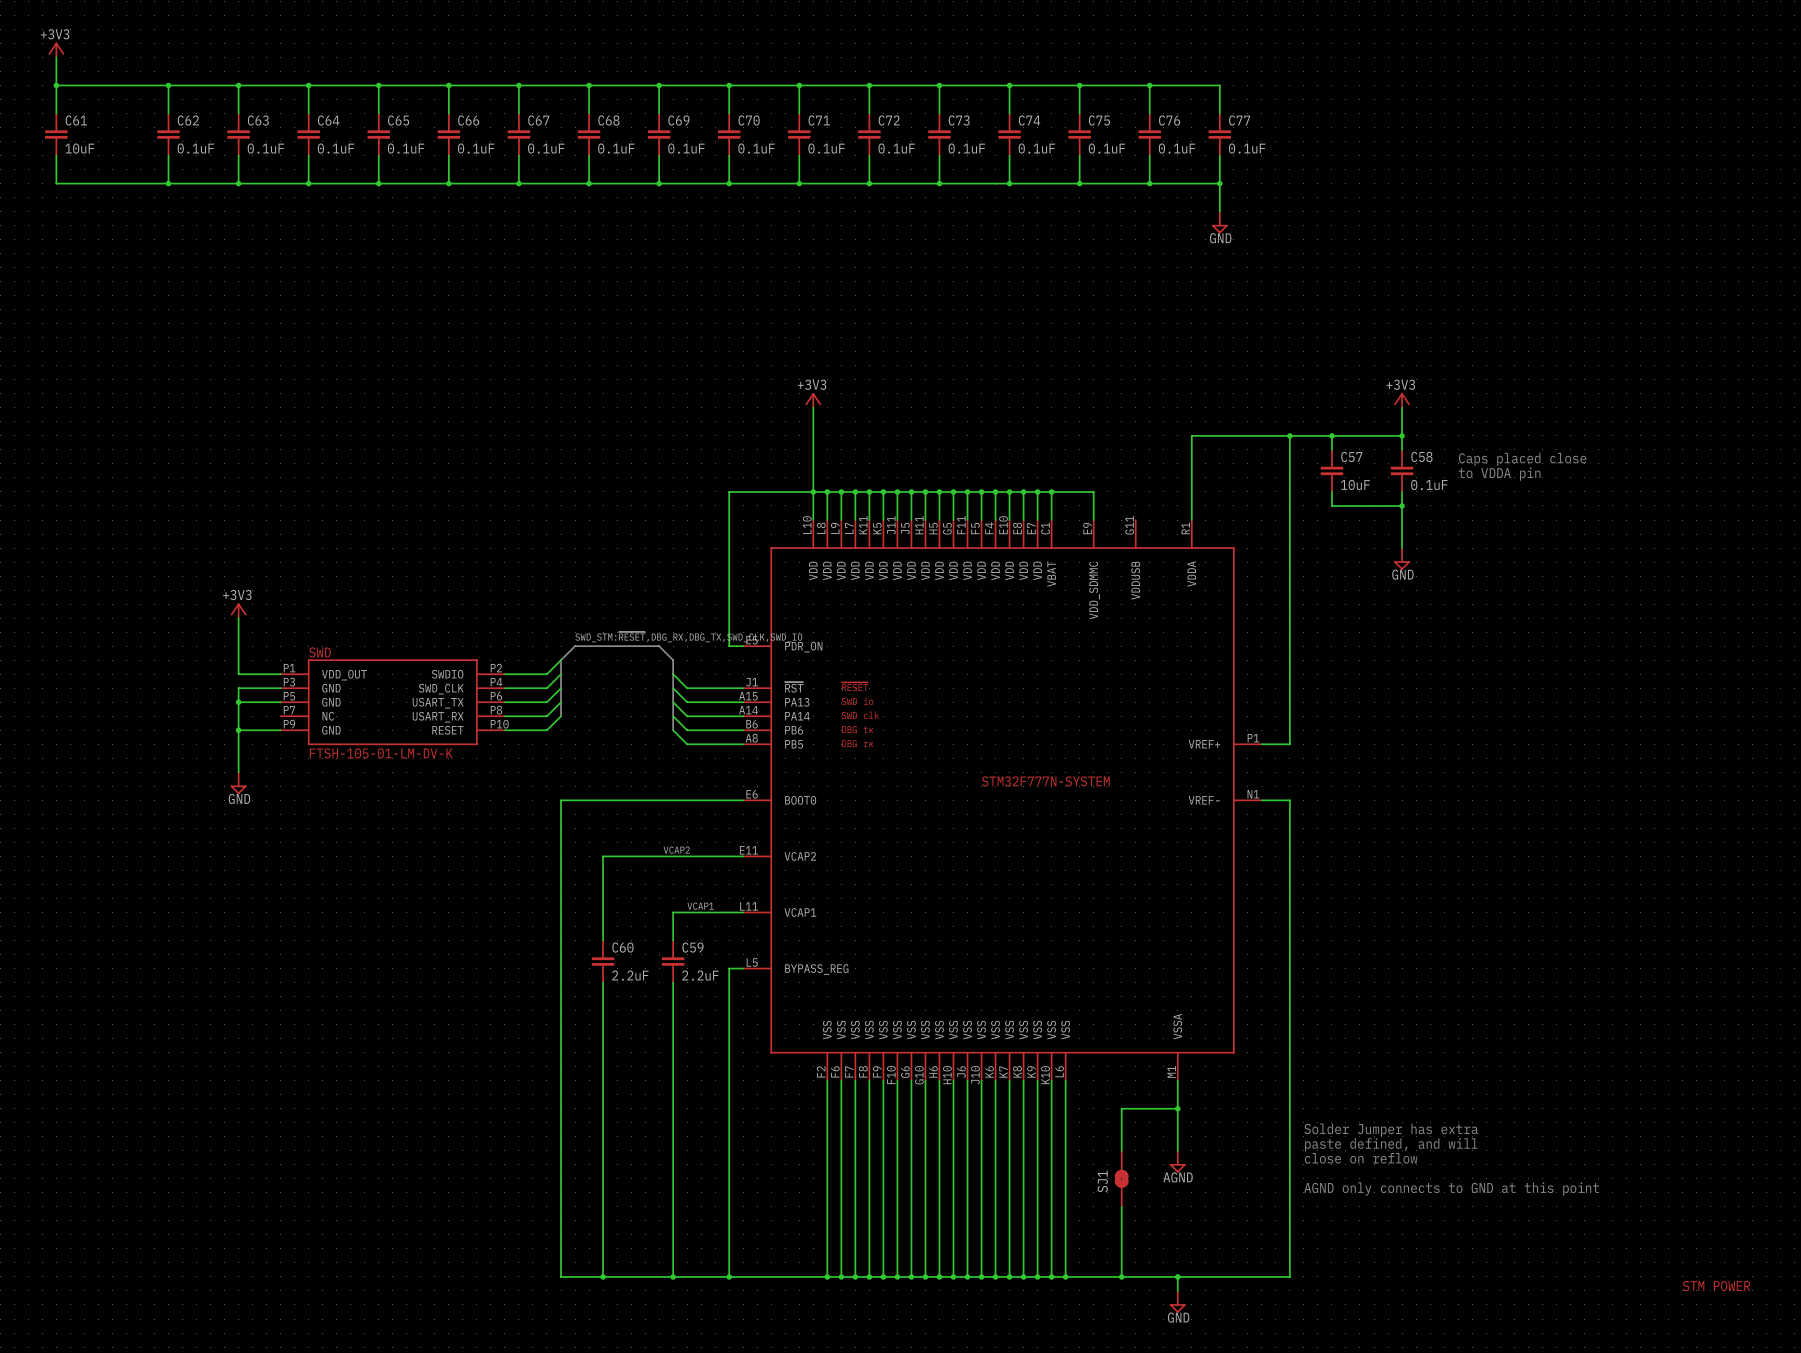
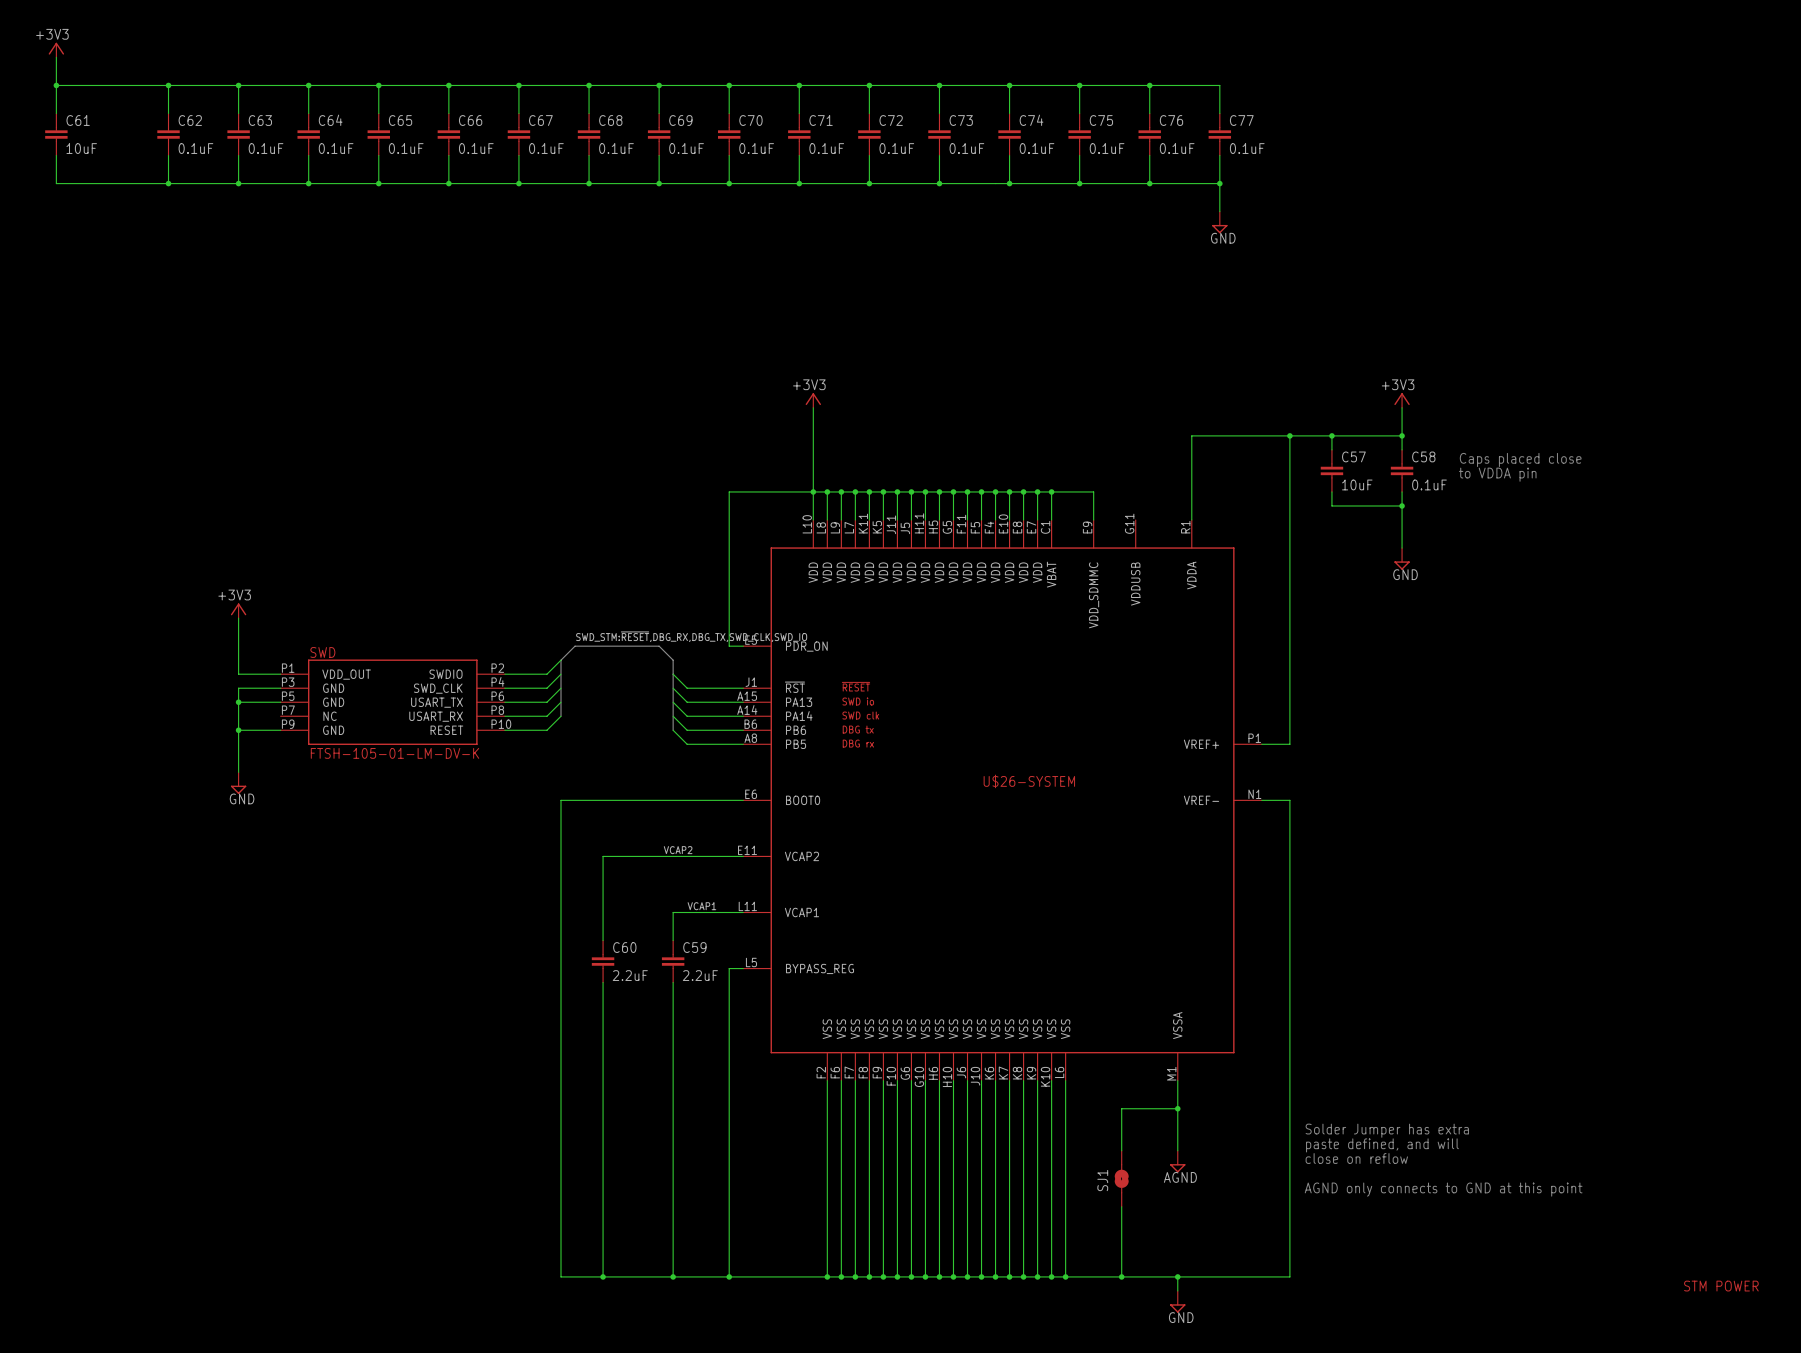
STM32F777N-SYSTEM name: STM32F777N-SYSTEM (1045, 781) -> U$26-SYSTEM (1029, 781)

